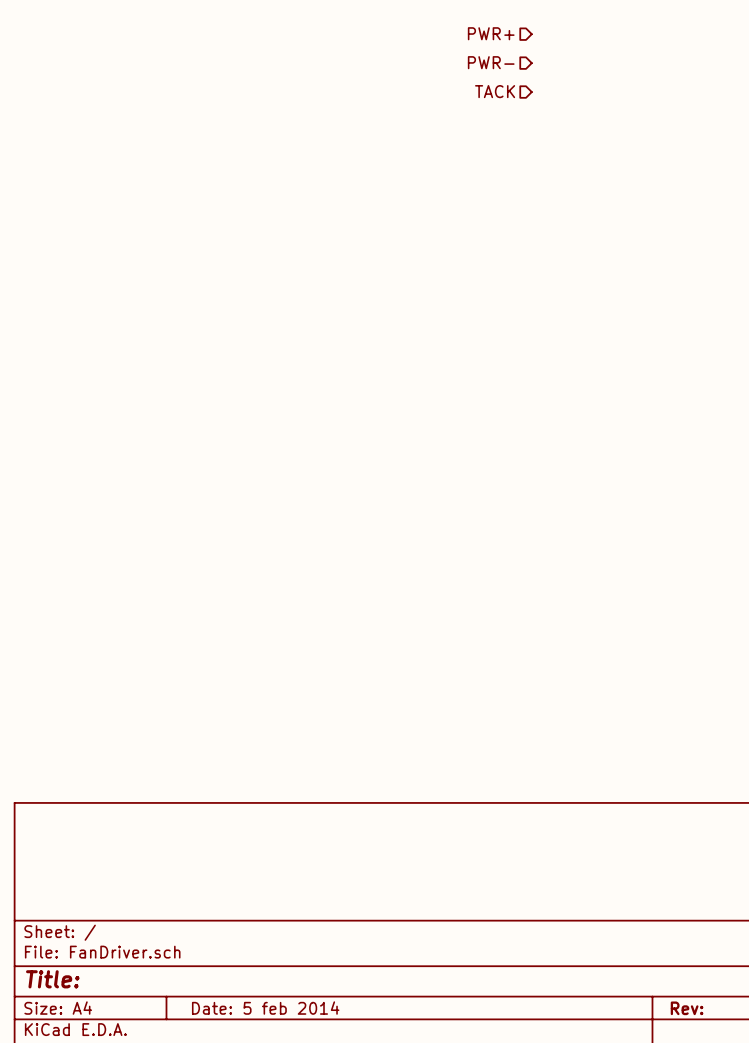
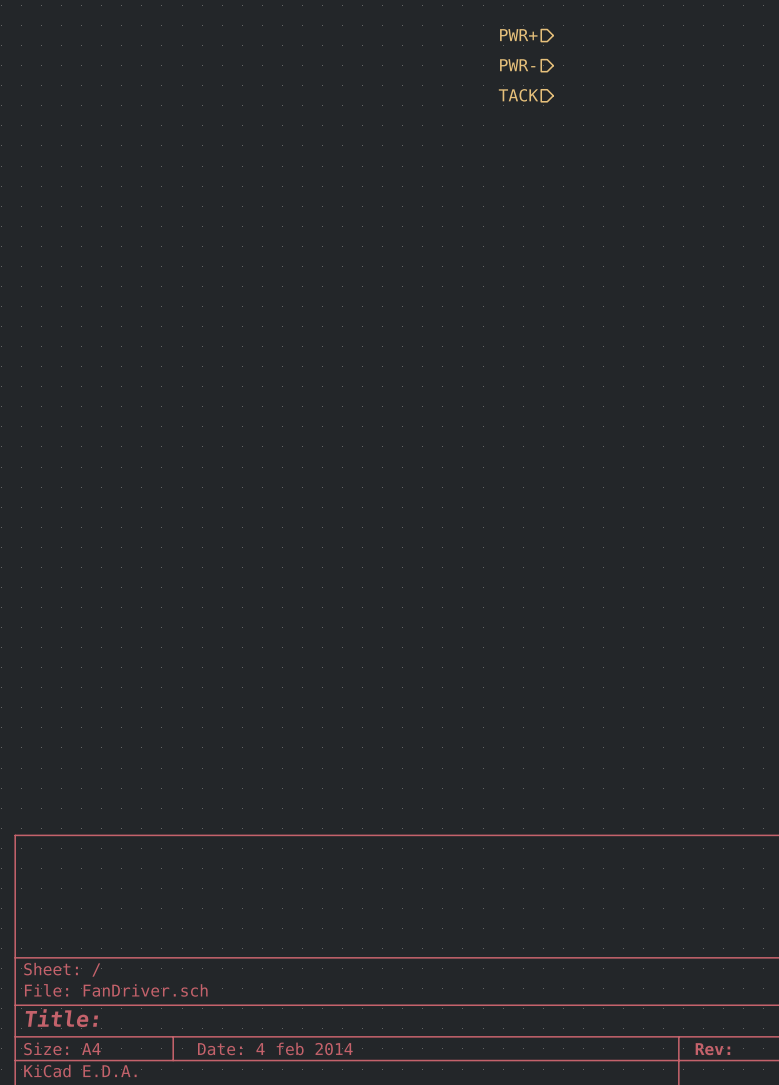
title block: Date: 5 feb 2014 (265, 1008) -> Date: 4 feb 2014 (275, 1048)

